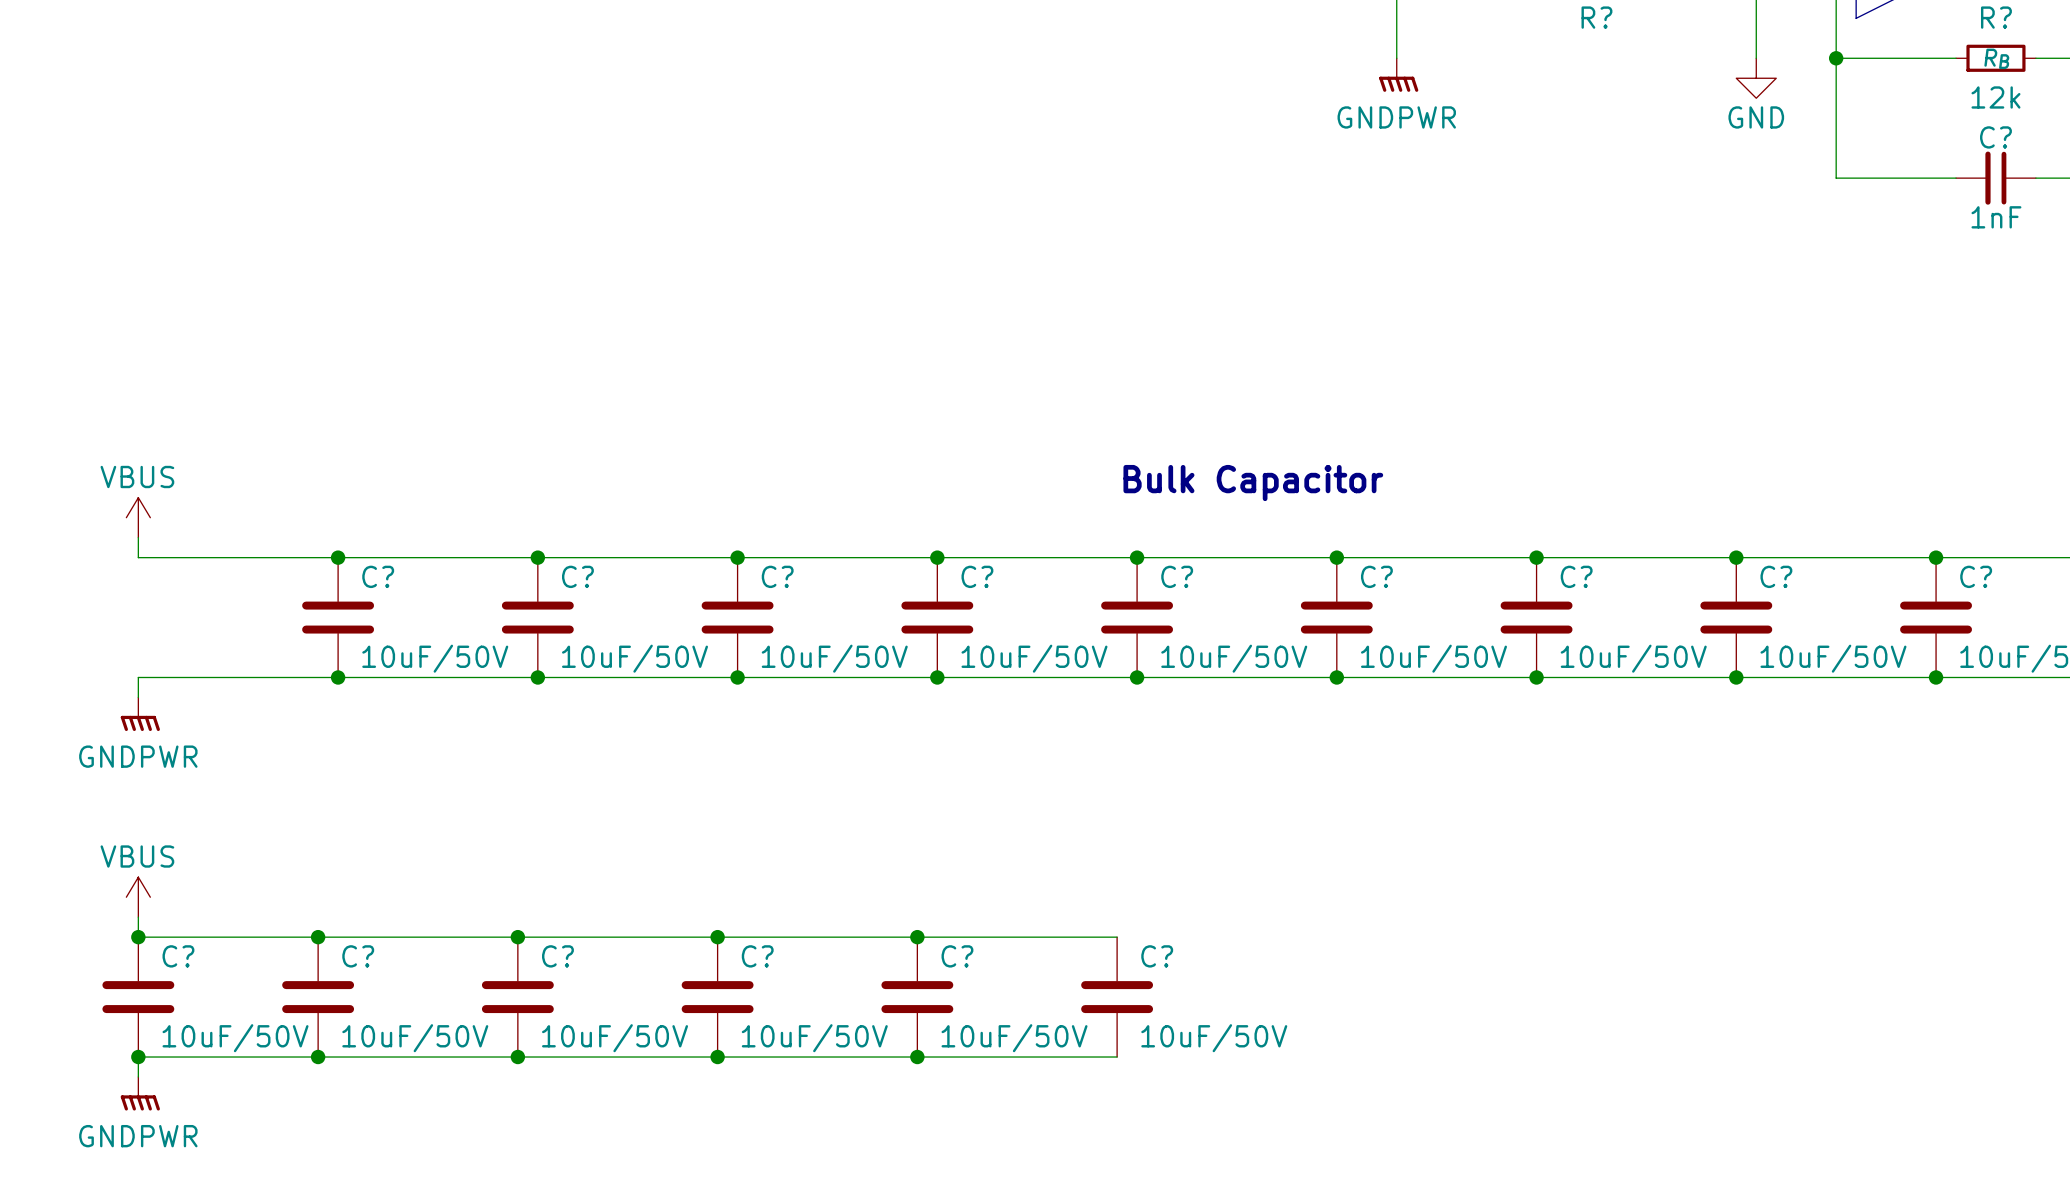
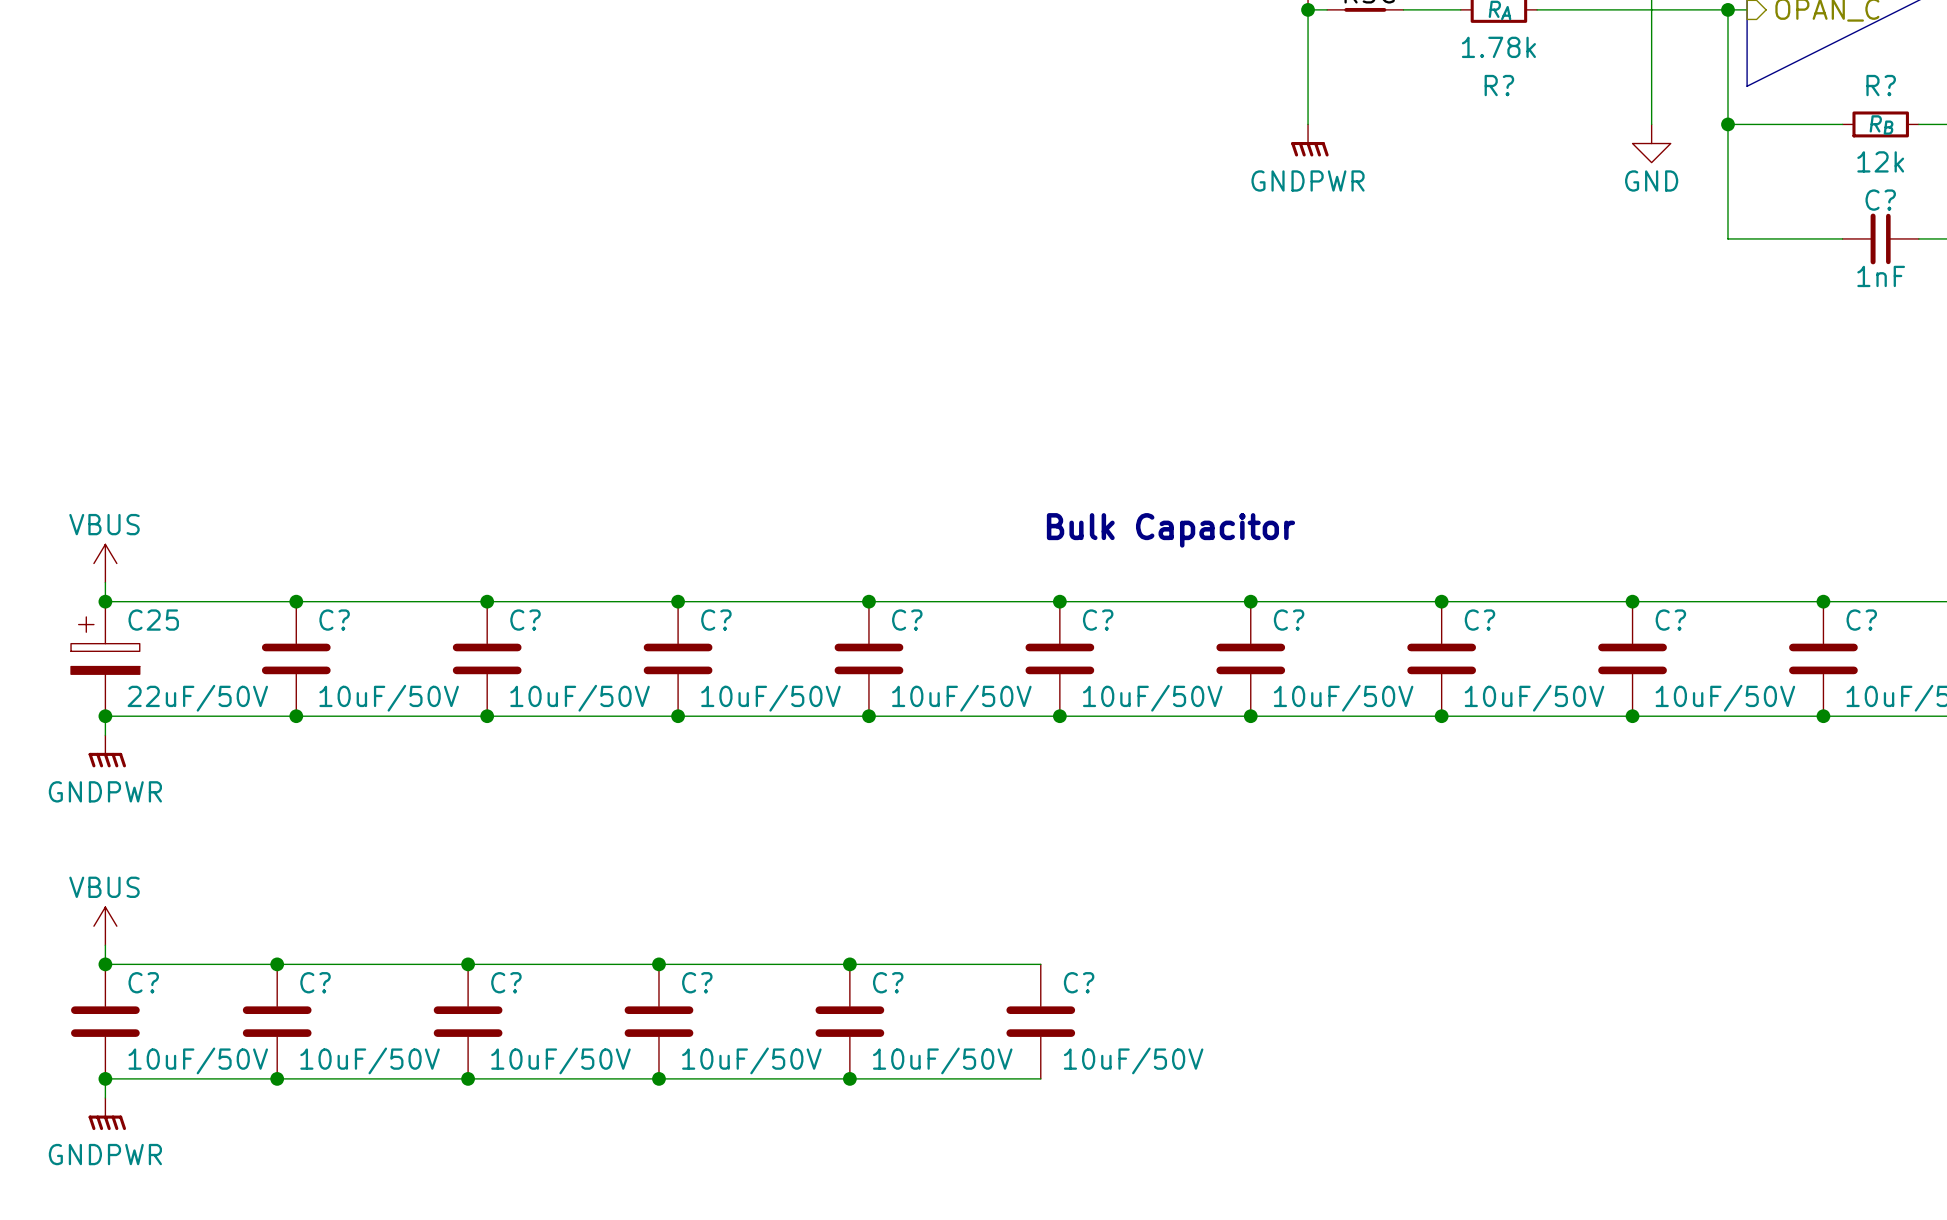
junction: none -> (105, 601)
C25: none -> 22uF/50V (105, 658)
junction: none -> (105, 716)

